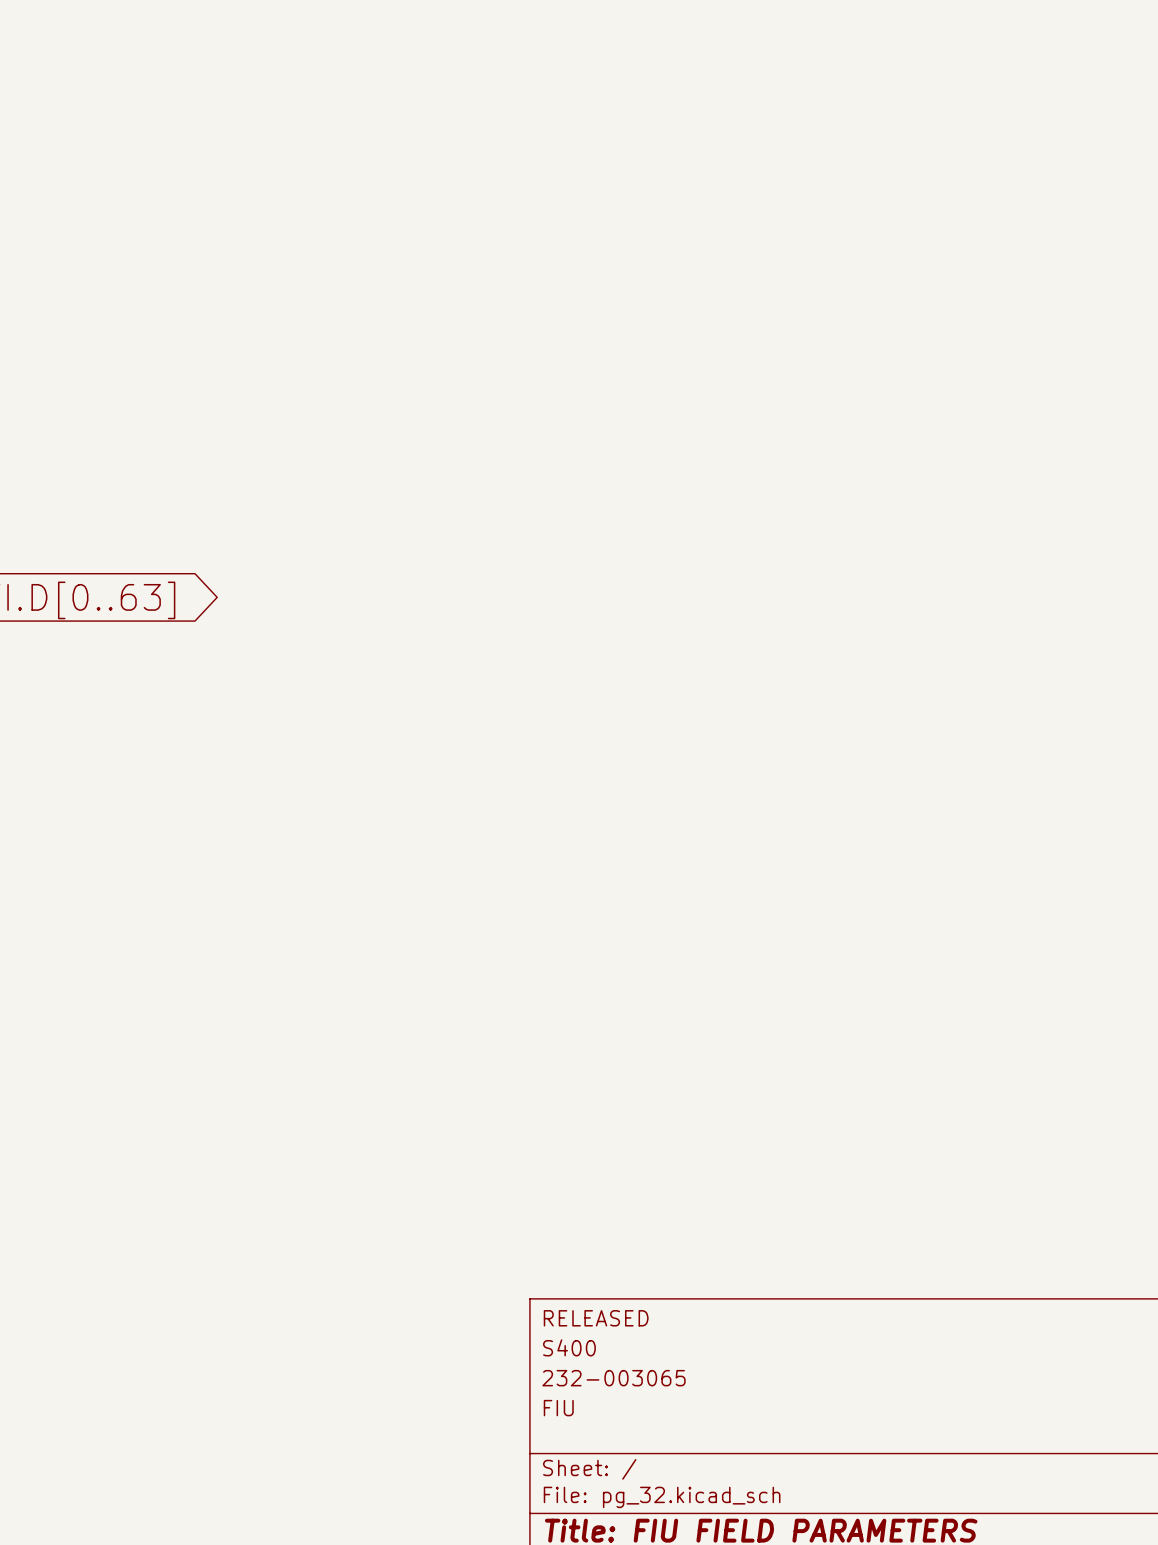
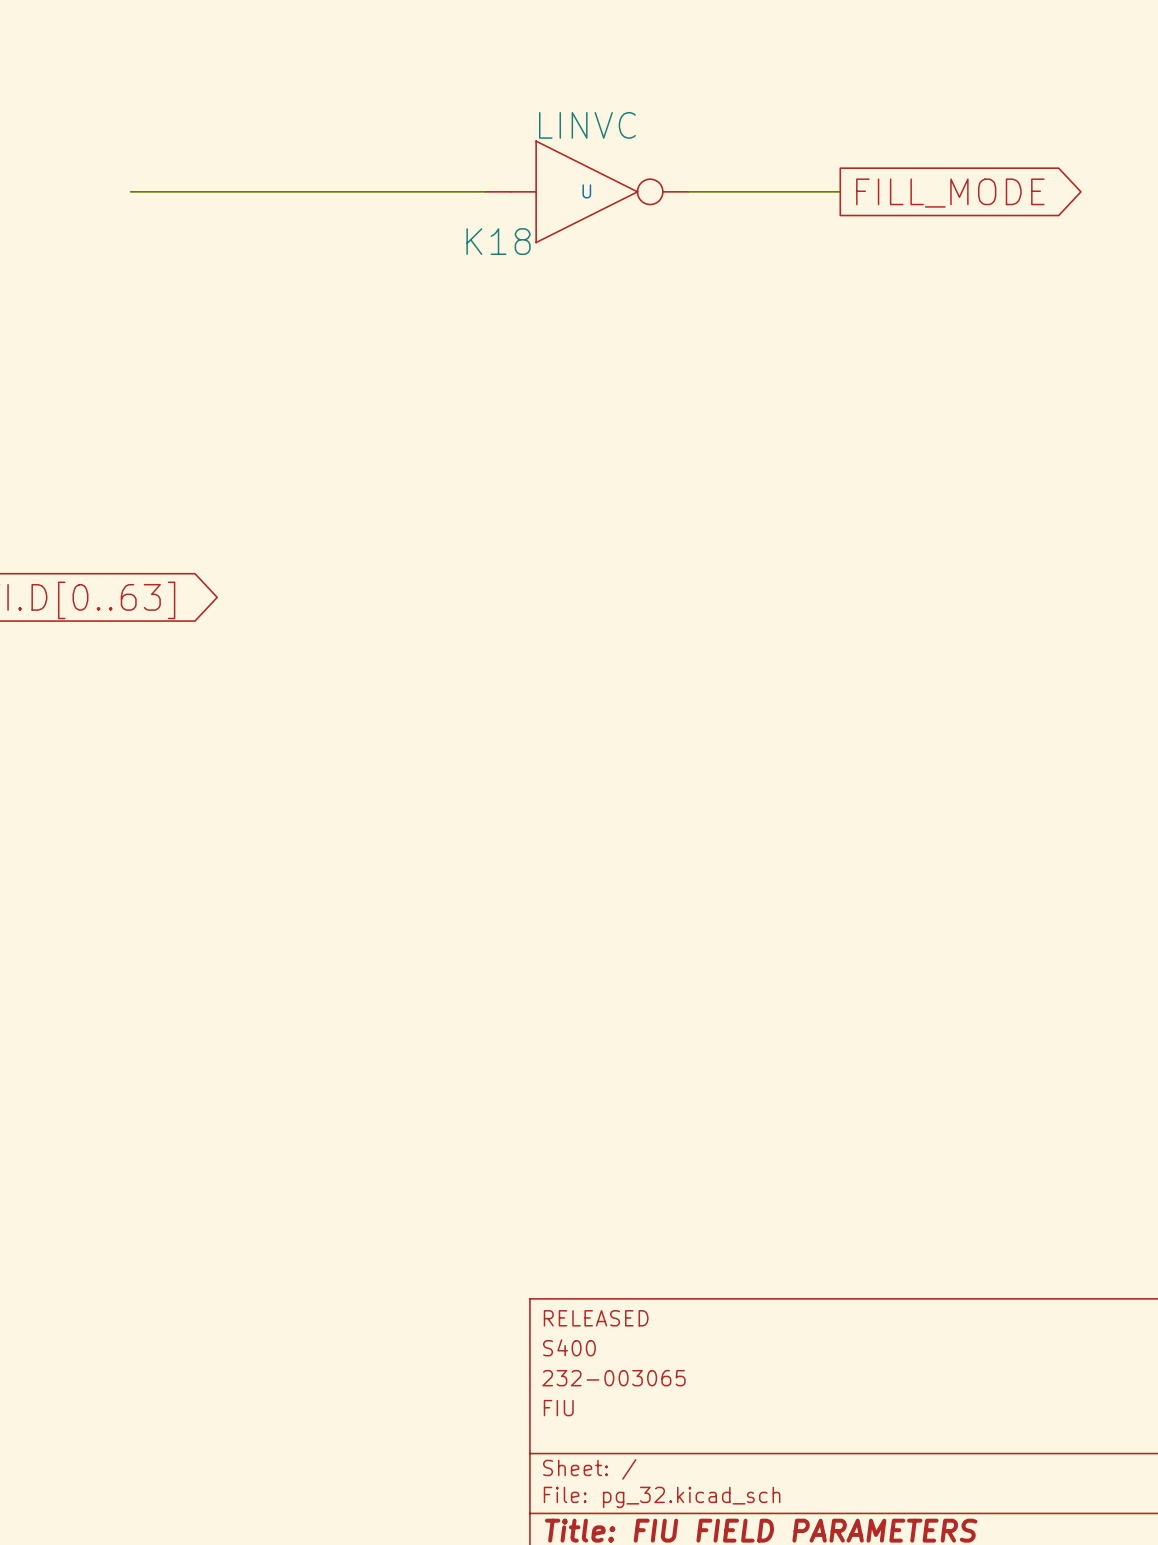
wire: none -> (130, 191) (485, 191)
U: none -> (586, 191)
wire: none -> (688, 191) (840, 191)
global label: none -> FILL_MODE (950, 193)

